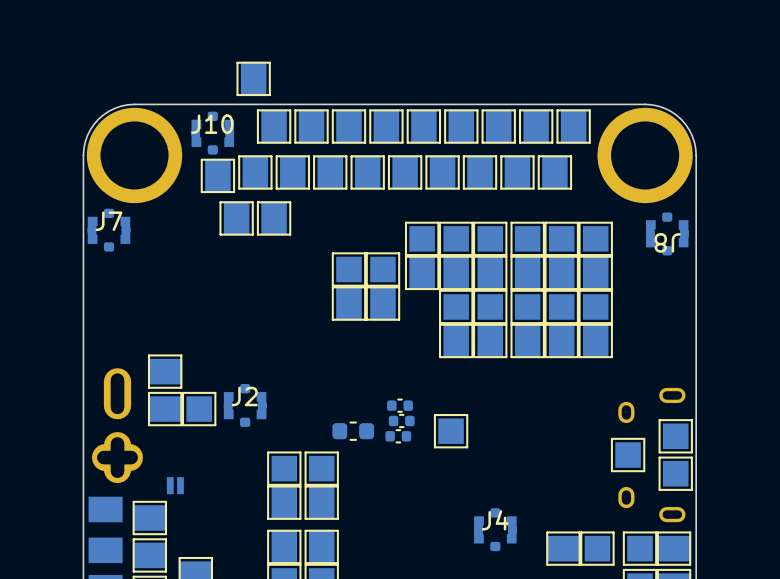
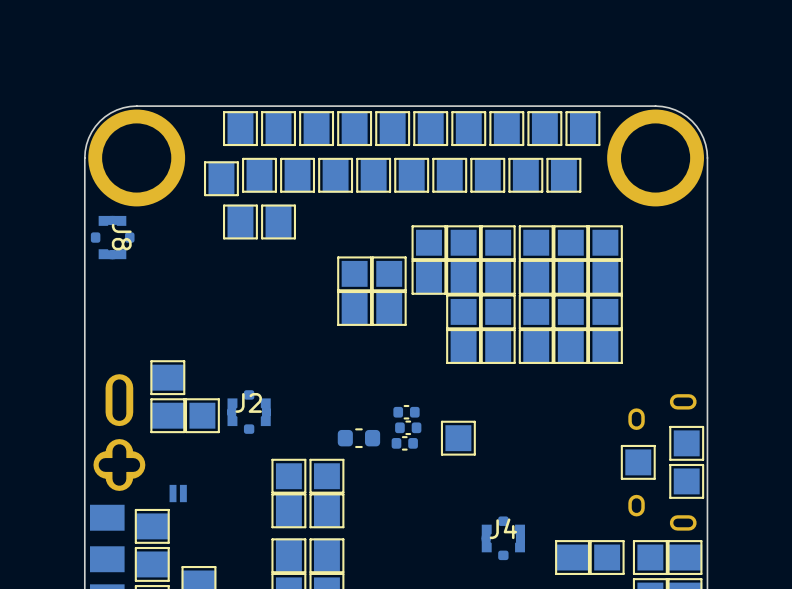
part position: (253, 78) -> (240, 128)
J10: (212, 133) -> none
J7: (108, 230) -> none
J8 rotation: 0° (667, 233) -> 90° counterclockwise (112, 237)
J8 position: (667, 233) -> (112, 237)

